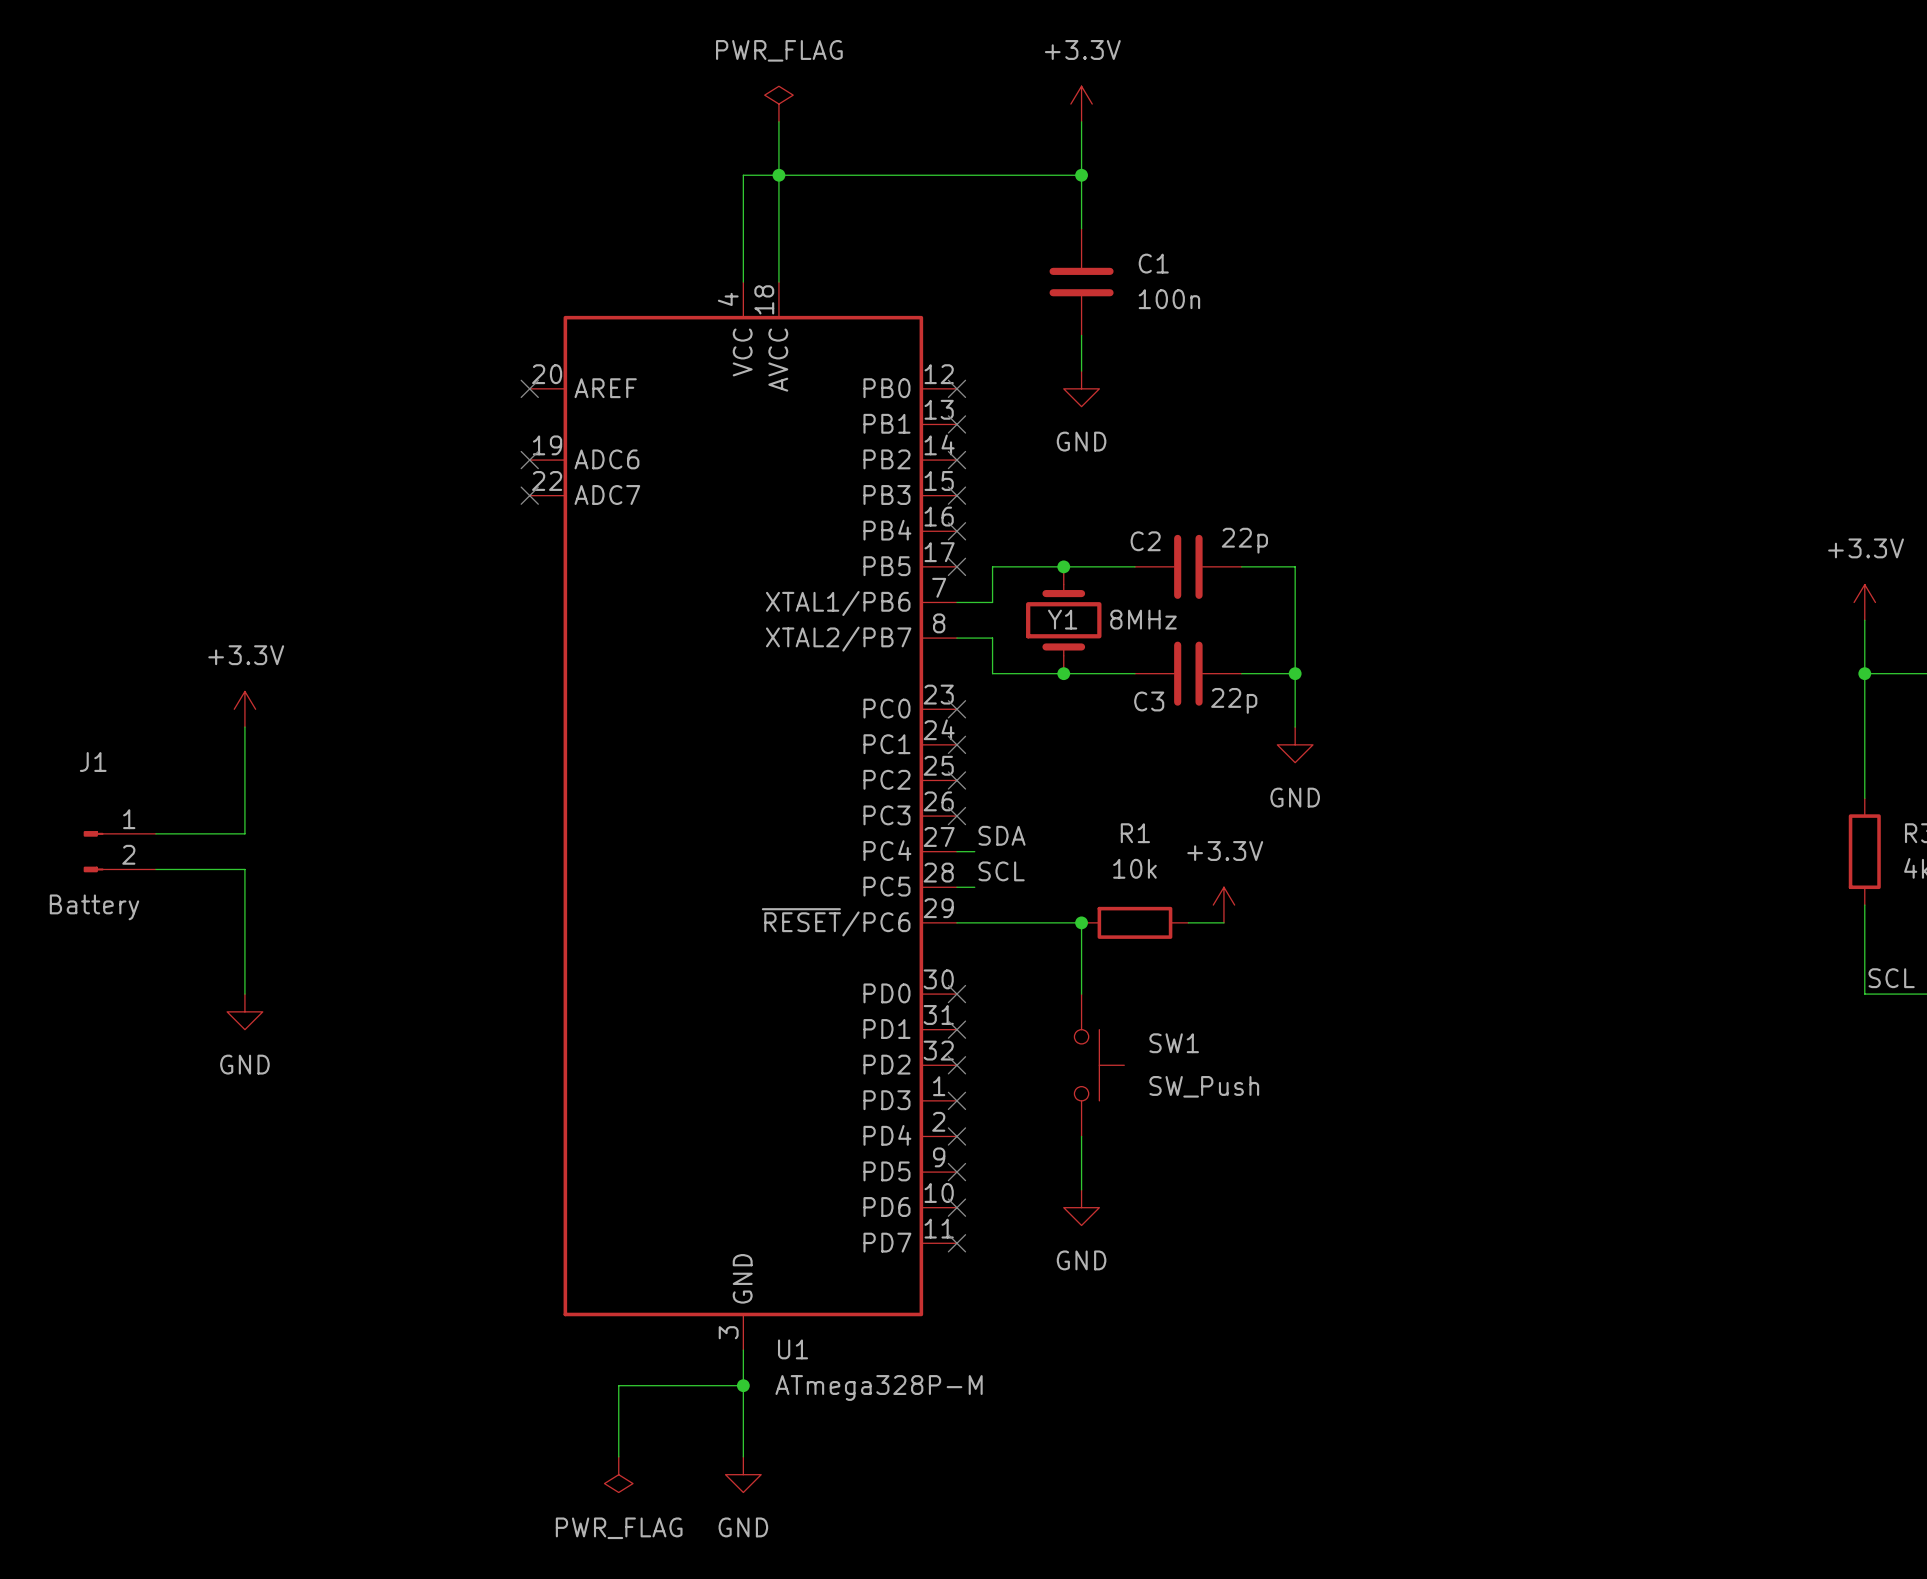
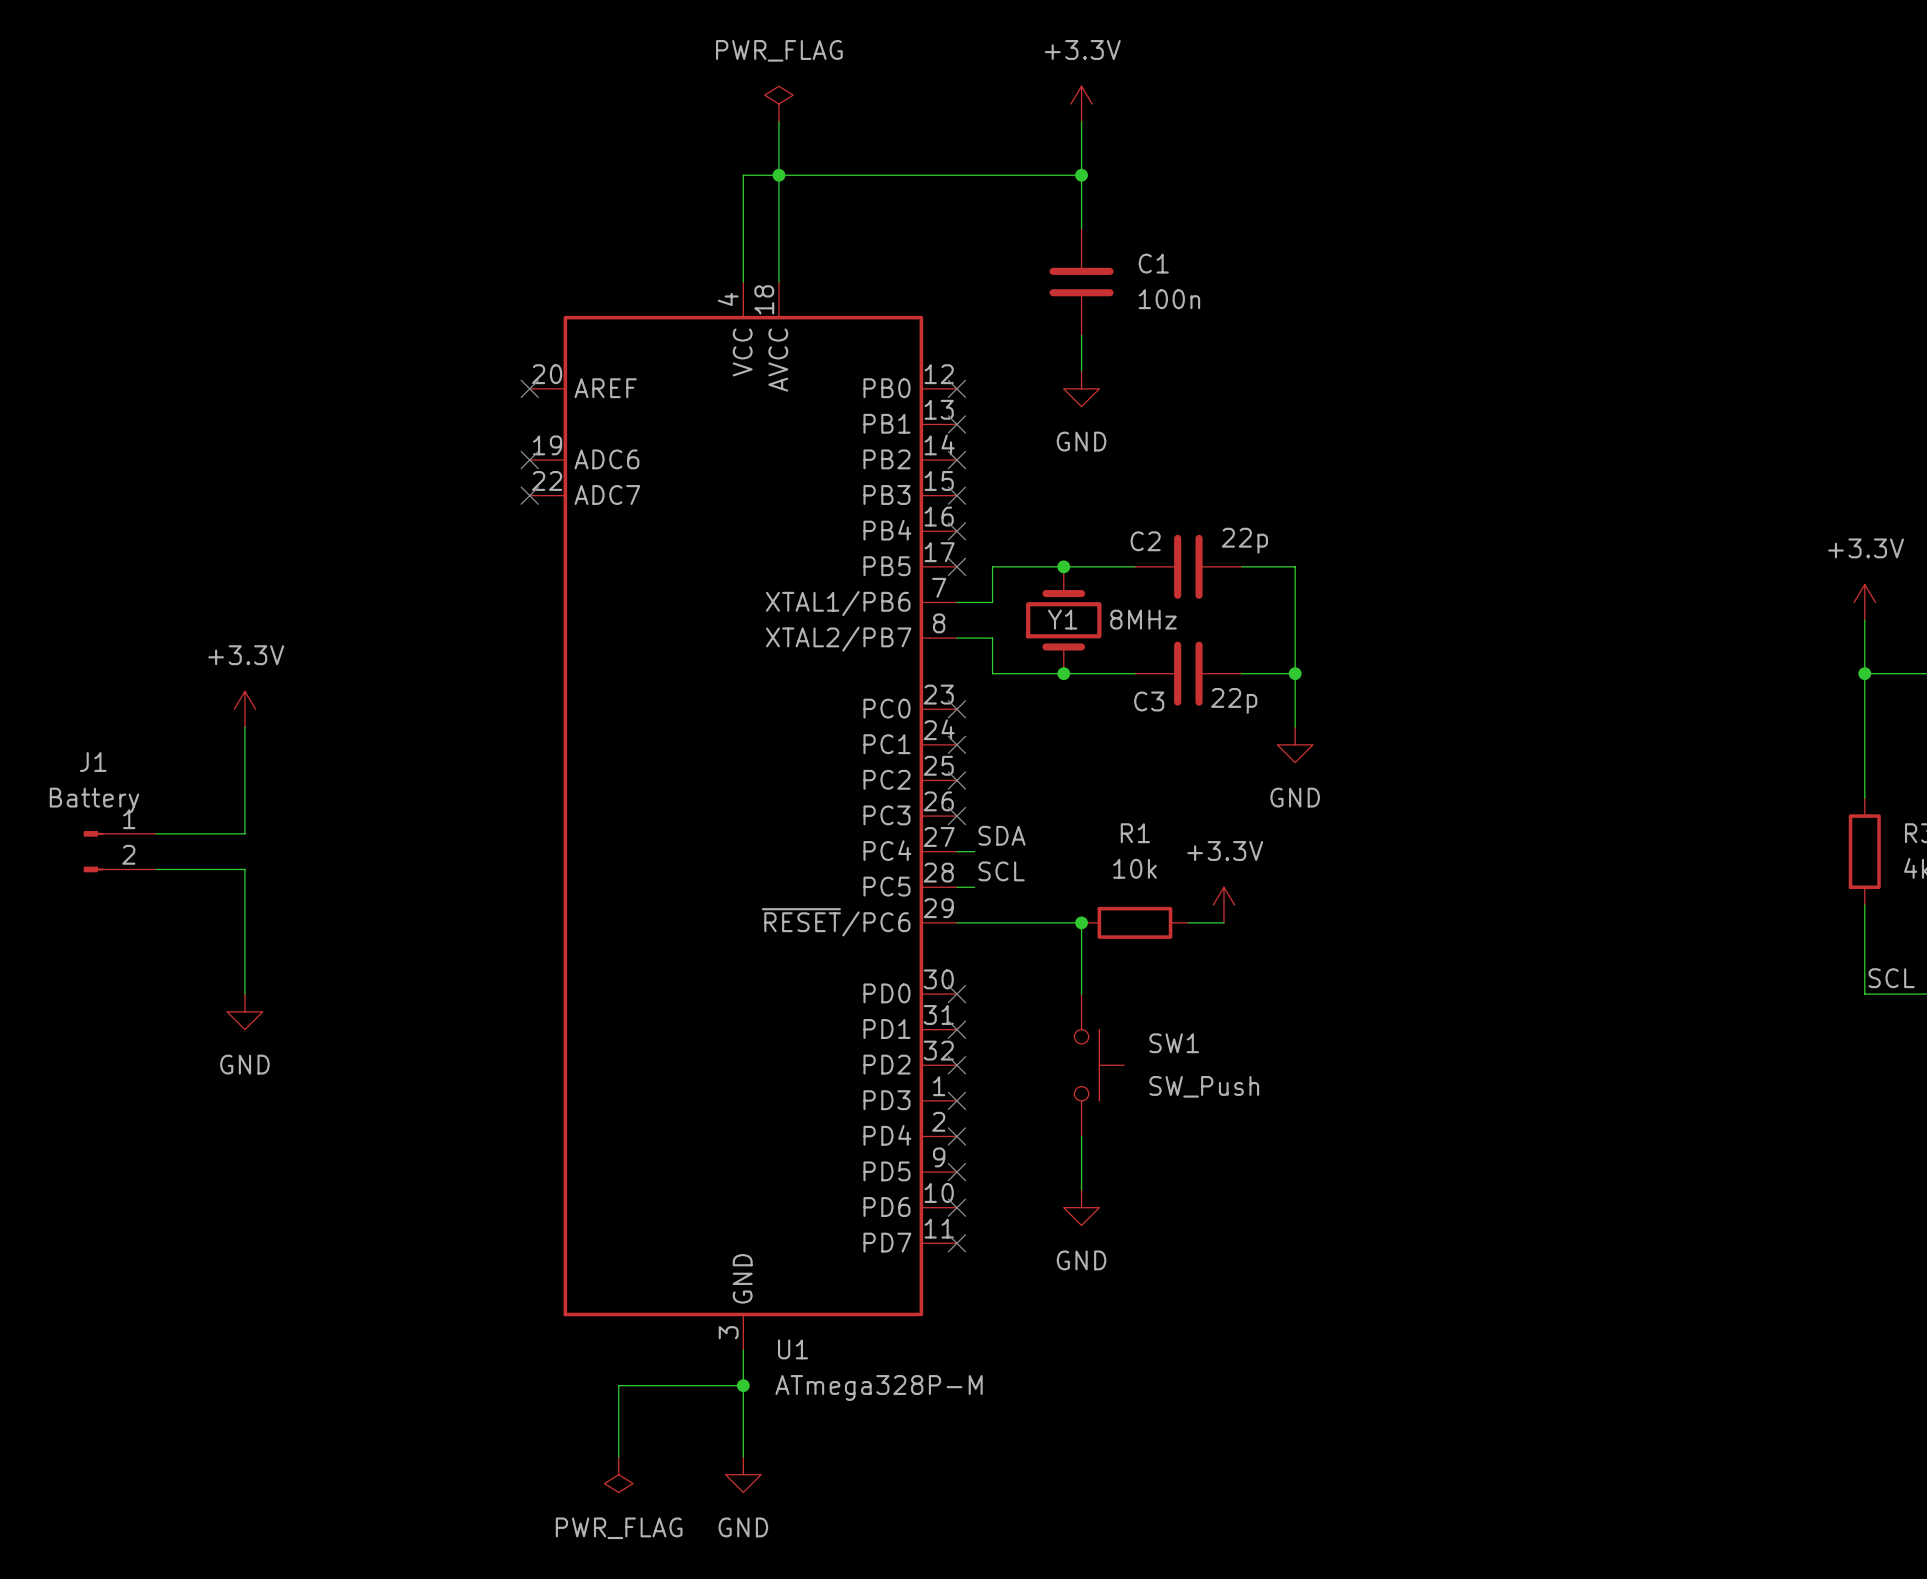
J1 value position: Battery (94, 907) -> Battery (94, 800)

